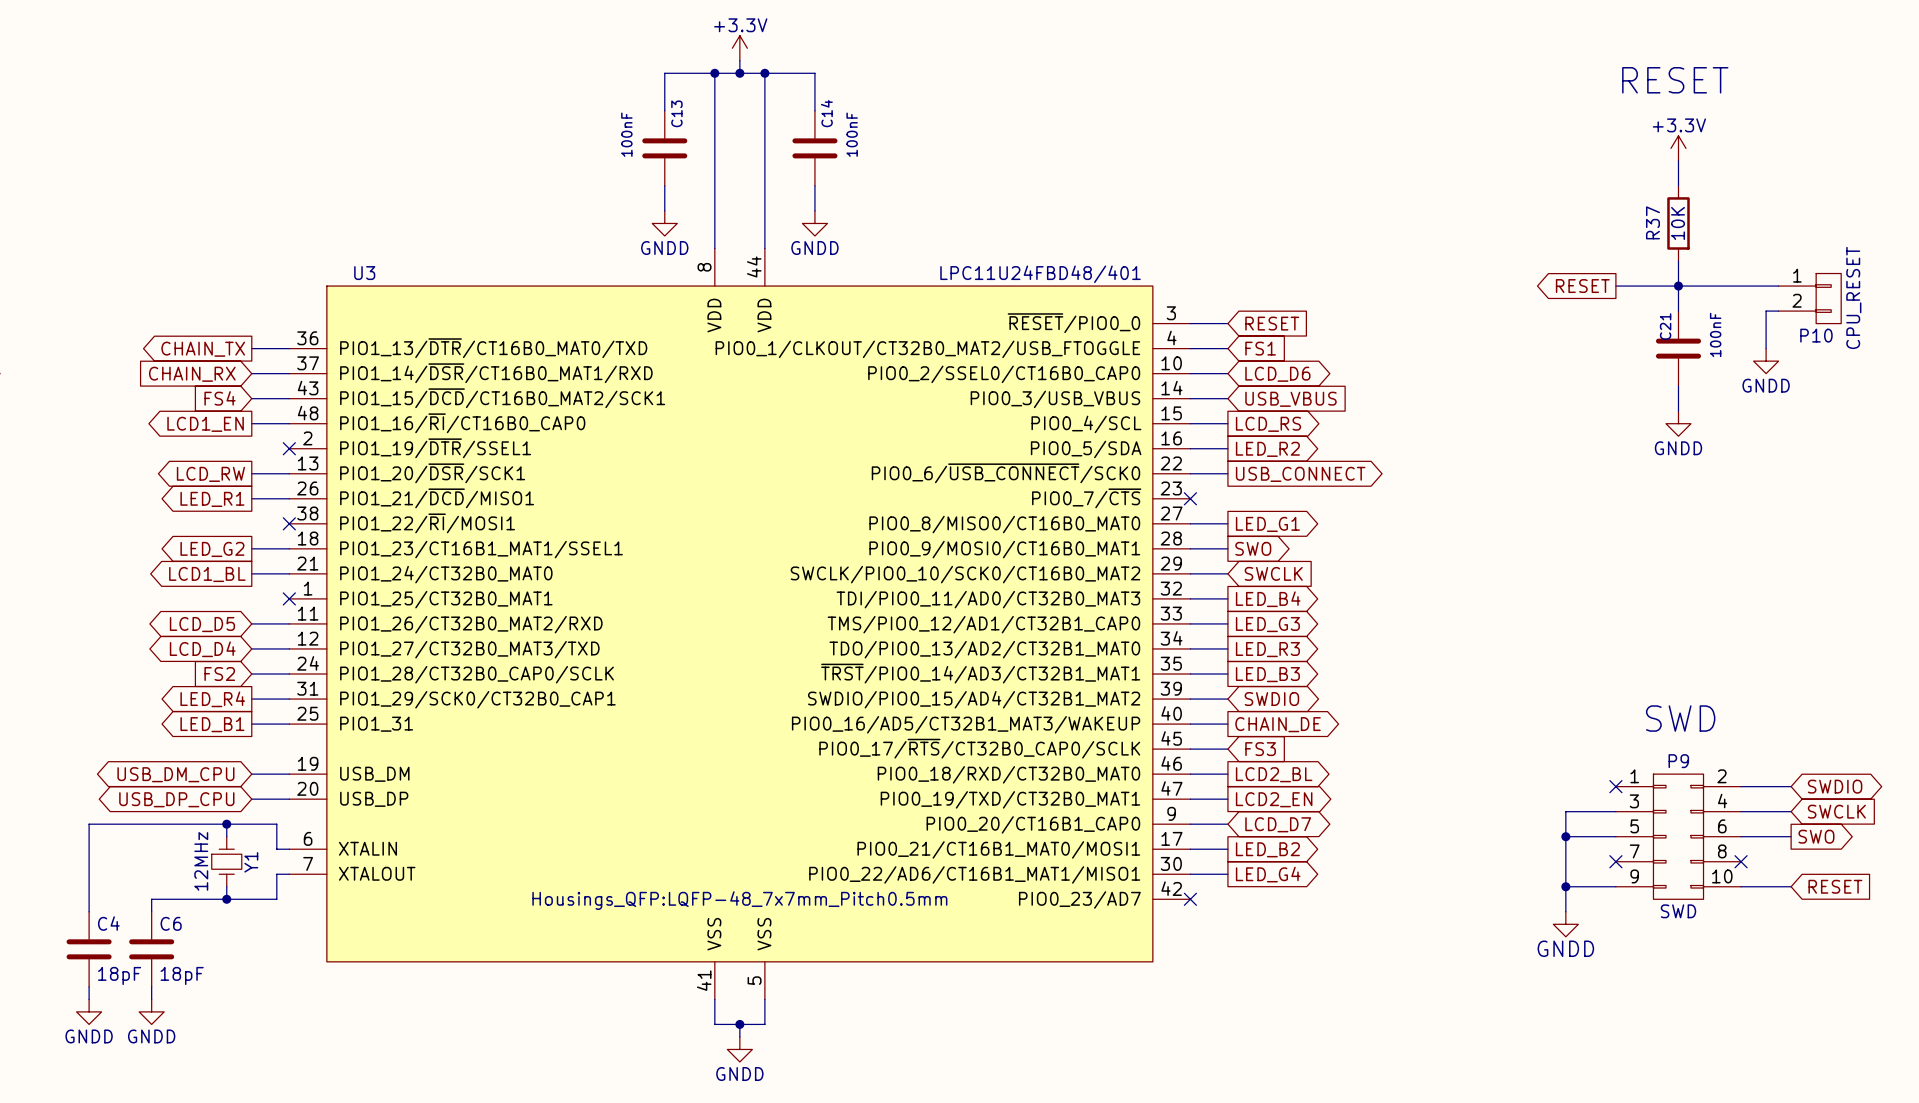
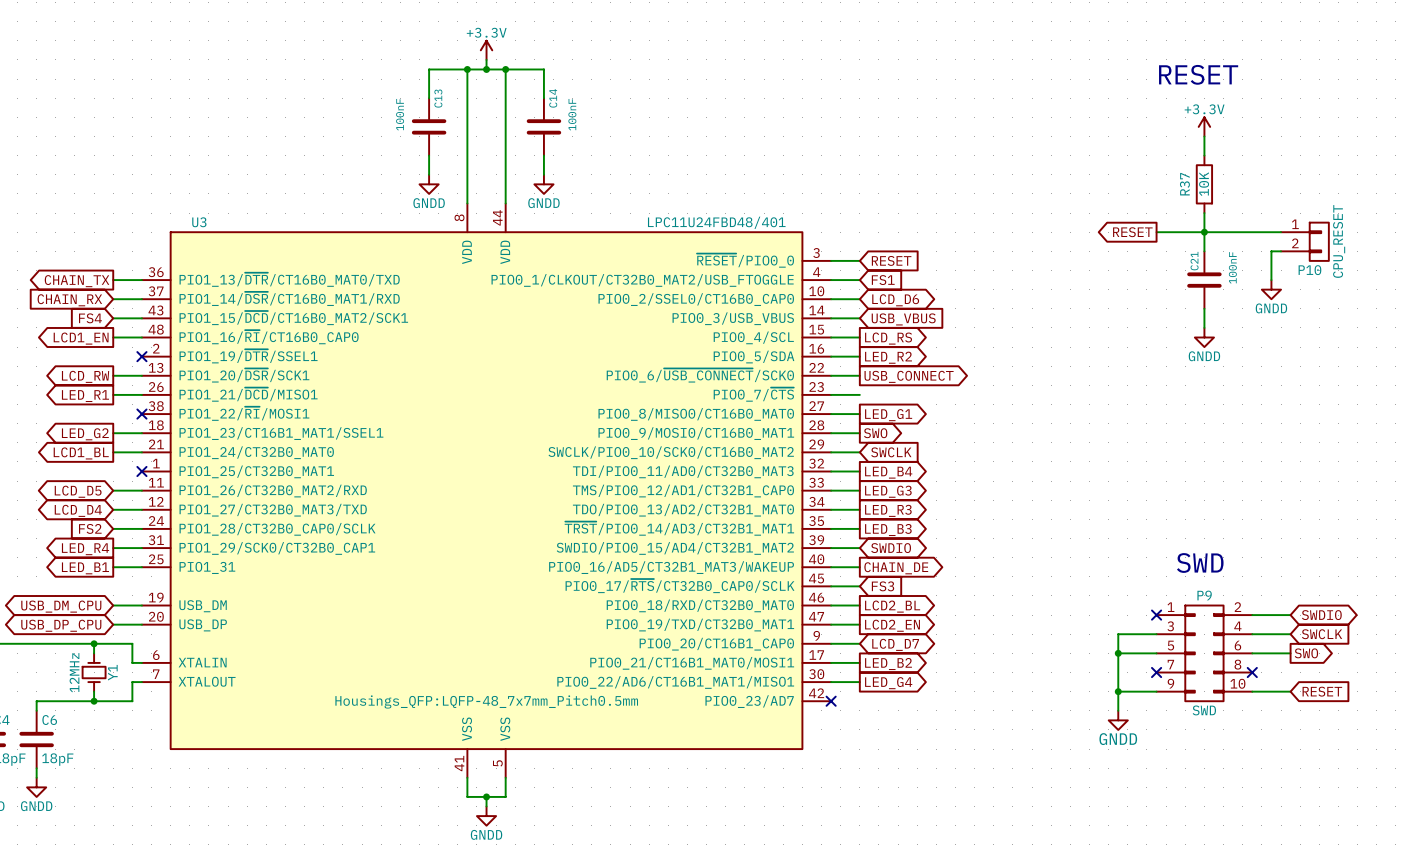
wire: none -> (831, 394) (859, 394)
no-connect mark: (1190, 498) -> none

